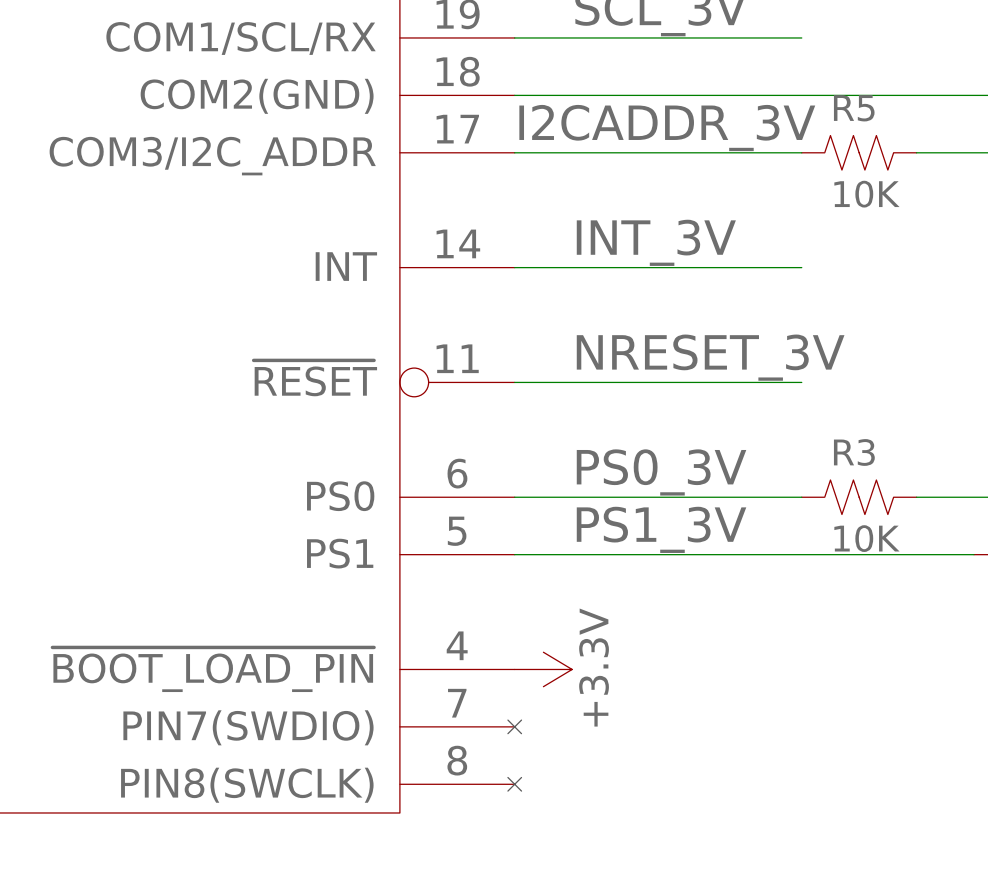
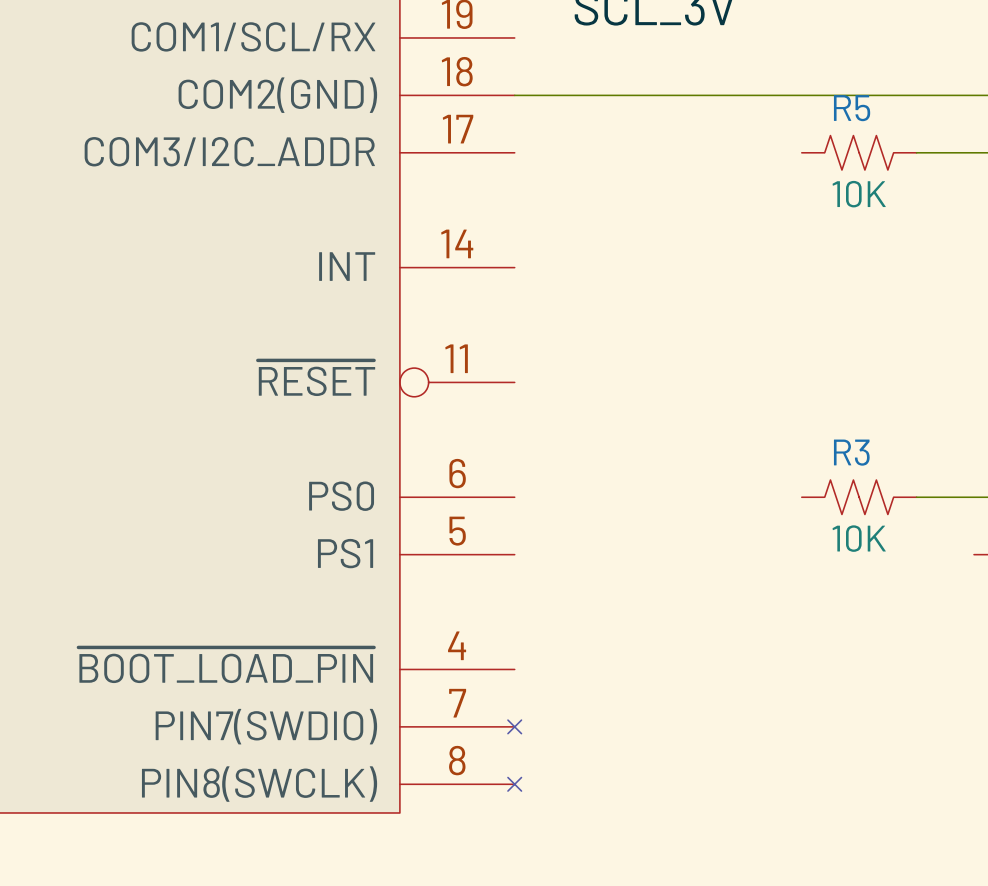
wire: (514, 37) (801, 37) -> none
label: I2CADDR_3V (667, 128) -> none
wire: (514, 152) (801, 152) -> none
label: INT_3V (656, 242) -> none
wire: (514, 267) (801, 267) -> none
label: NRESET_3V (710, 357) -> none
wire: (514, 382) (801, 382) -> none
label: PS0_3V (661, 472) -> none
wire: (514, 497) (801, 497) -> none
label: PS1_3V (661, 529) -> none
wire: (514, 554) (973, 554) -> none
power symbol: +3.3V (543, 669) -> none

